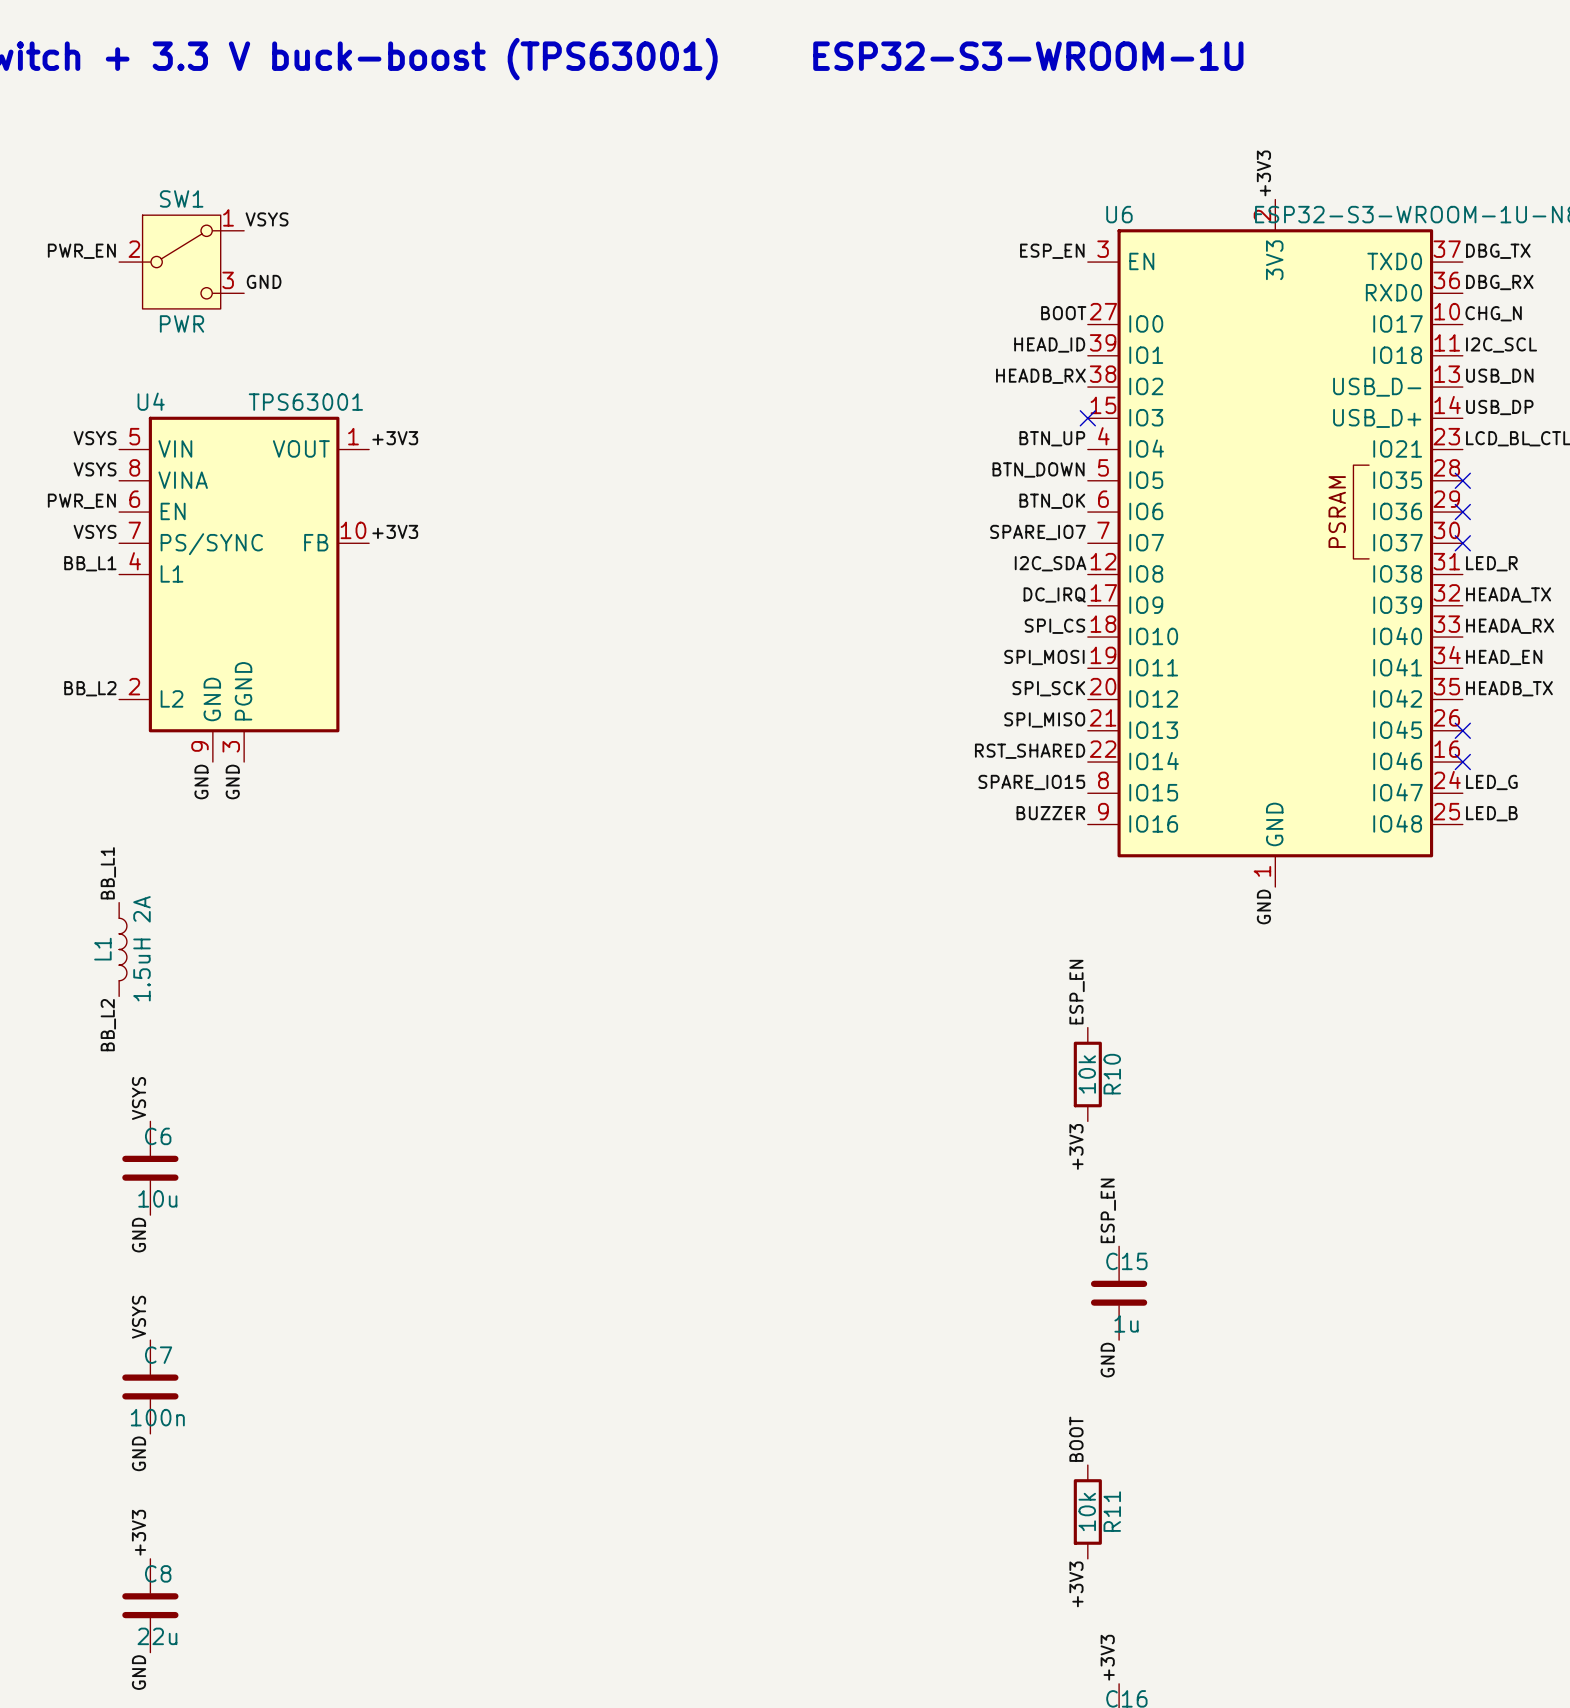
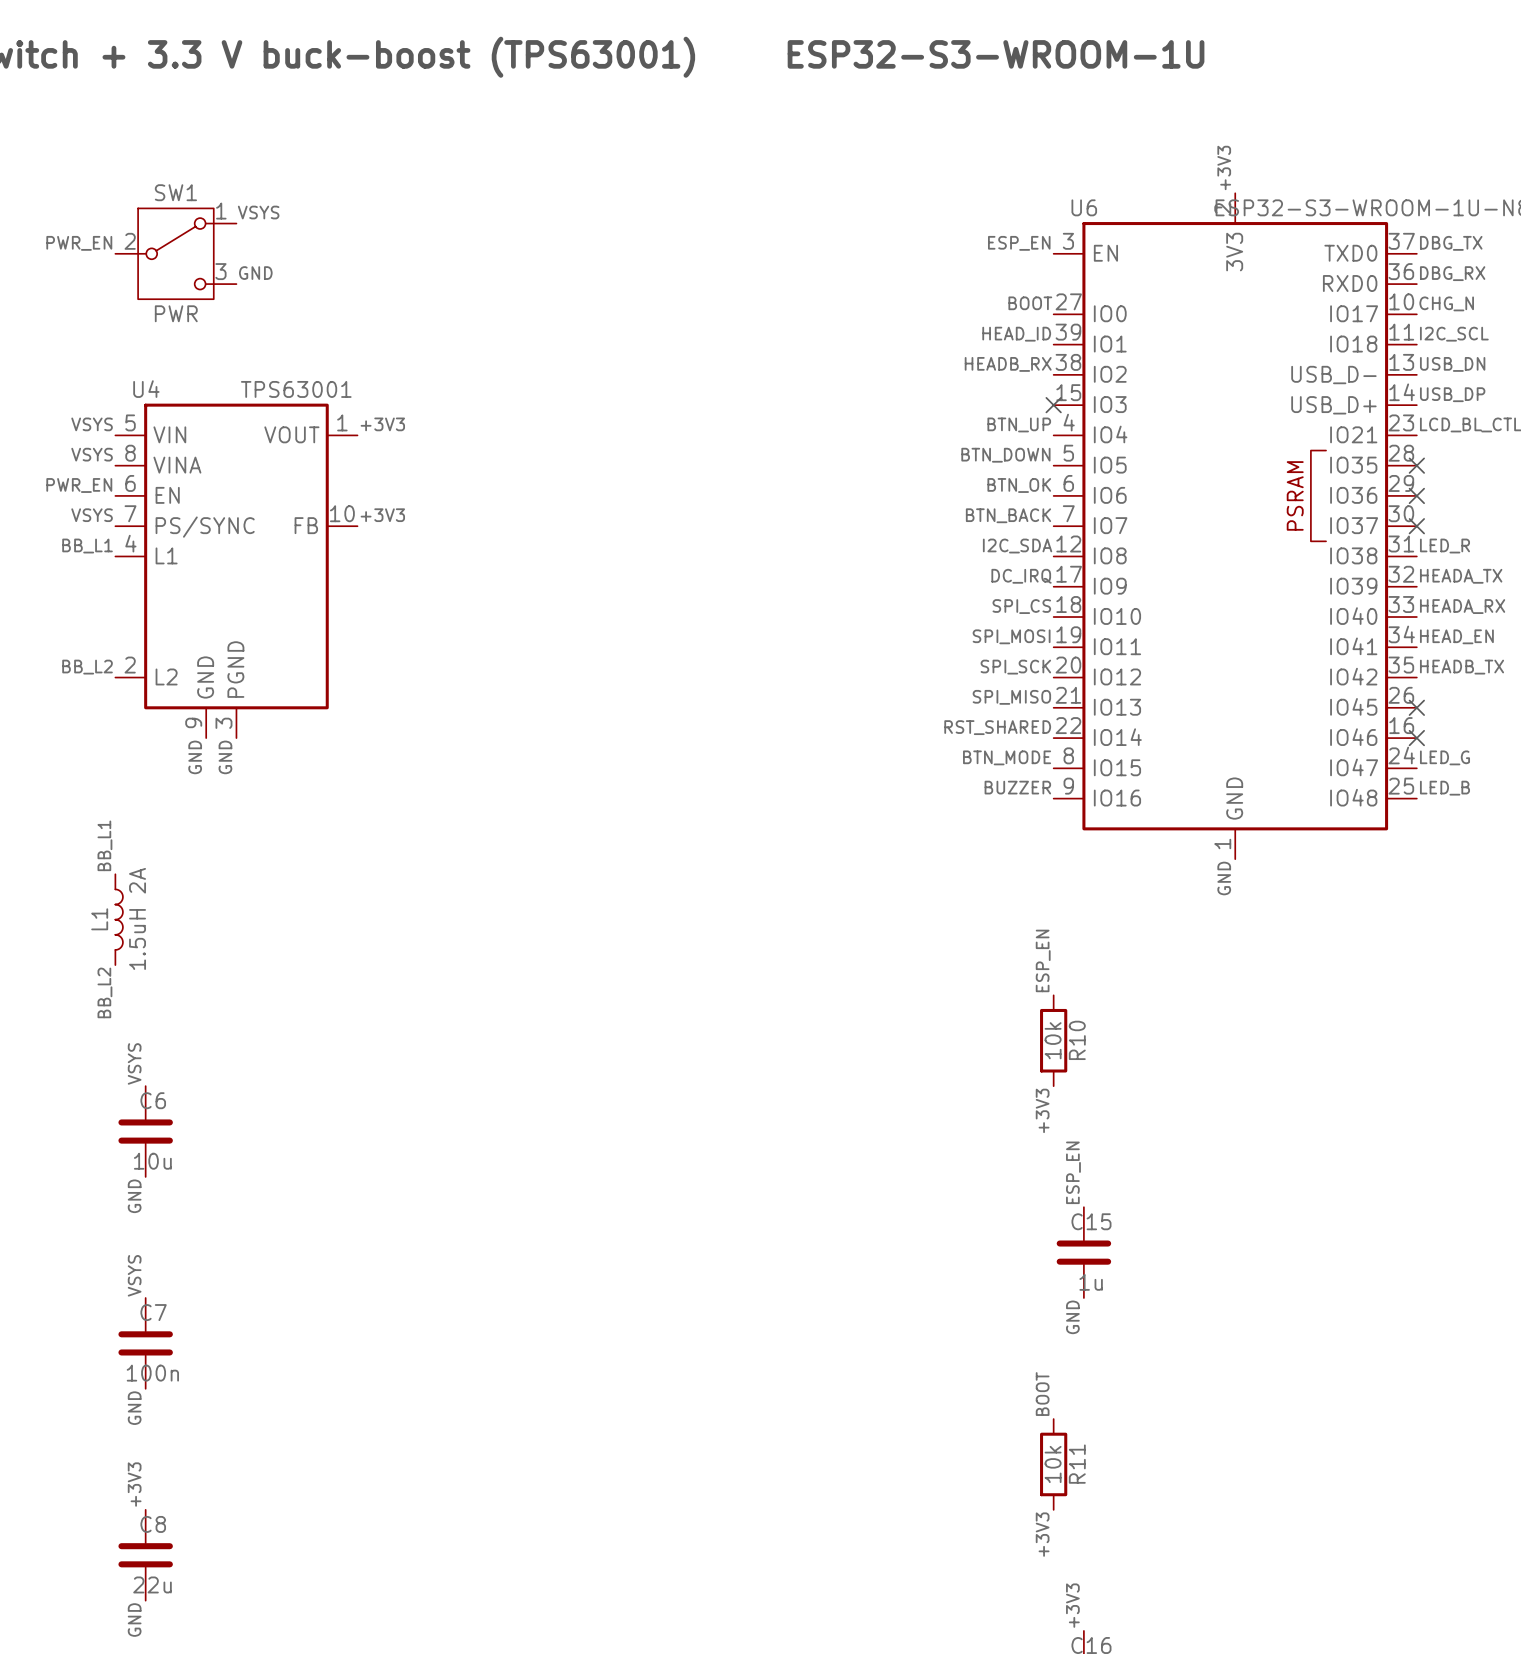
label: SPARE_IO7 (1037, 532) -> BTN_BACK (1008, 515)
label: SPARE_IO15 (1031, 782) -> BTN_MODE (1007, 757)

